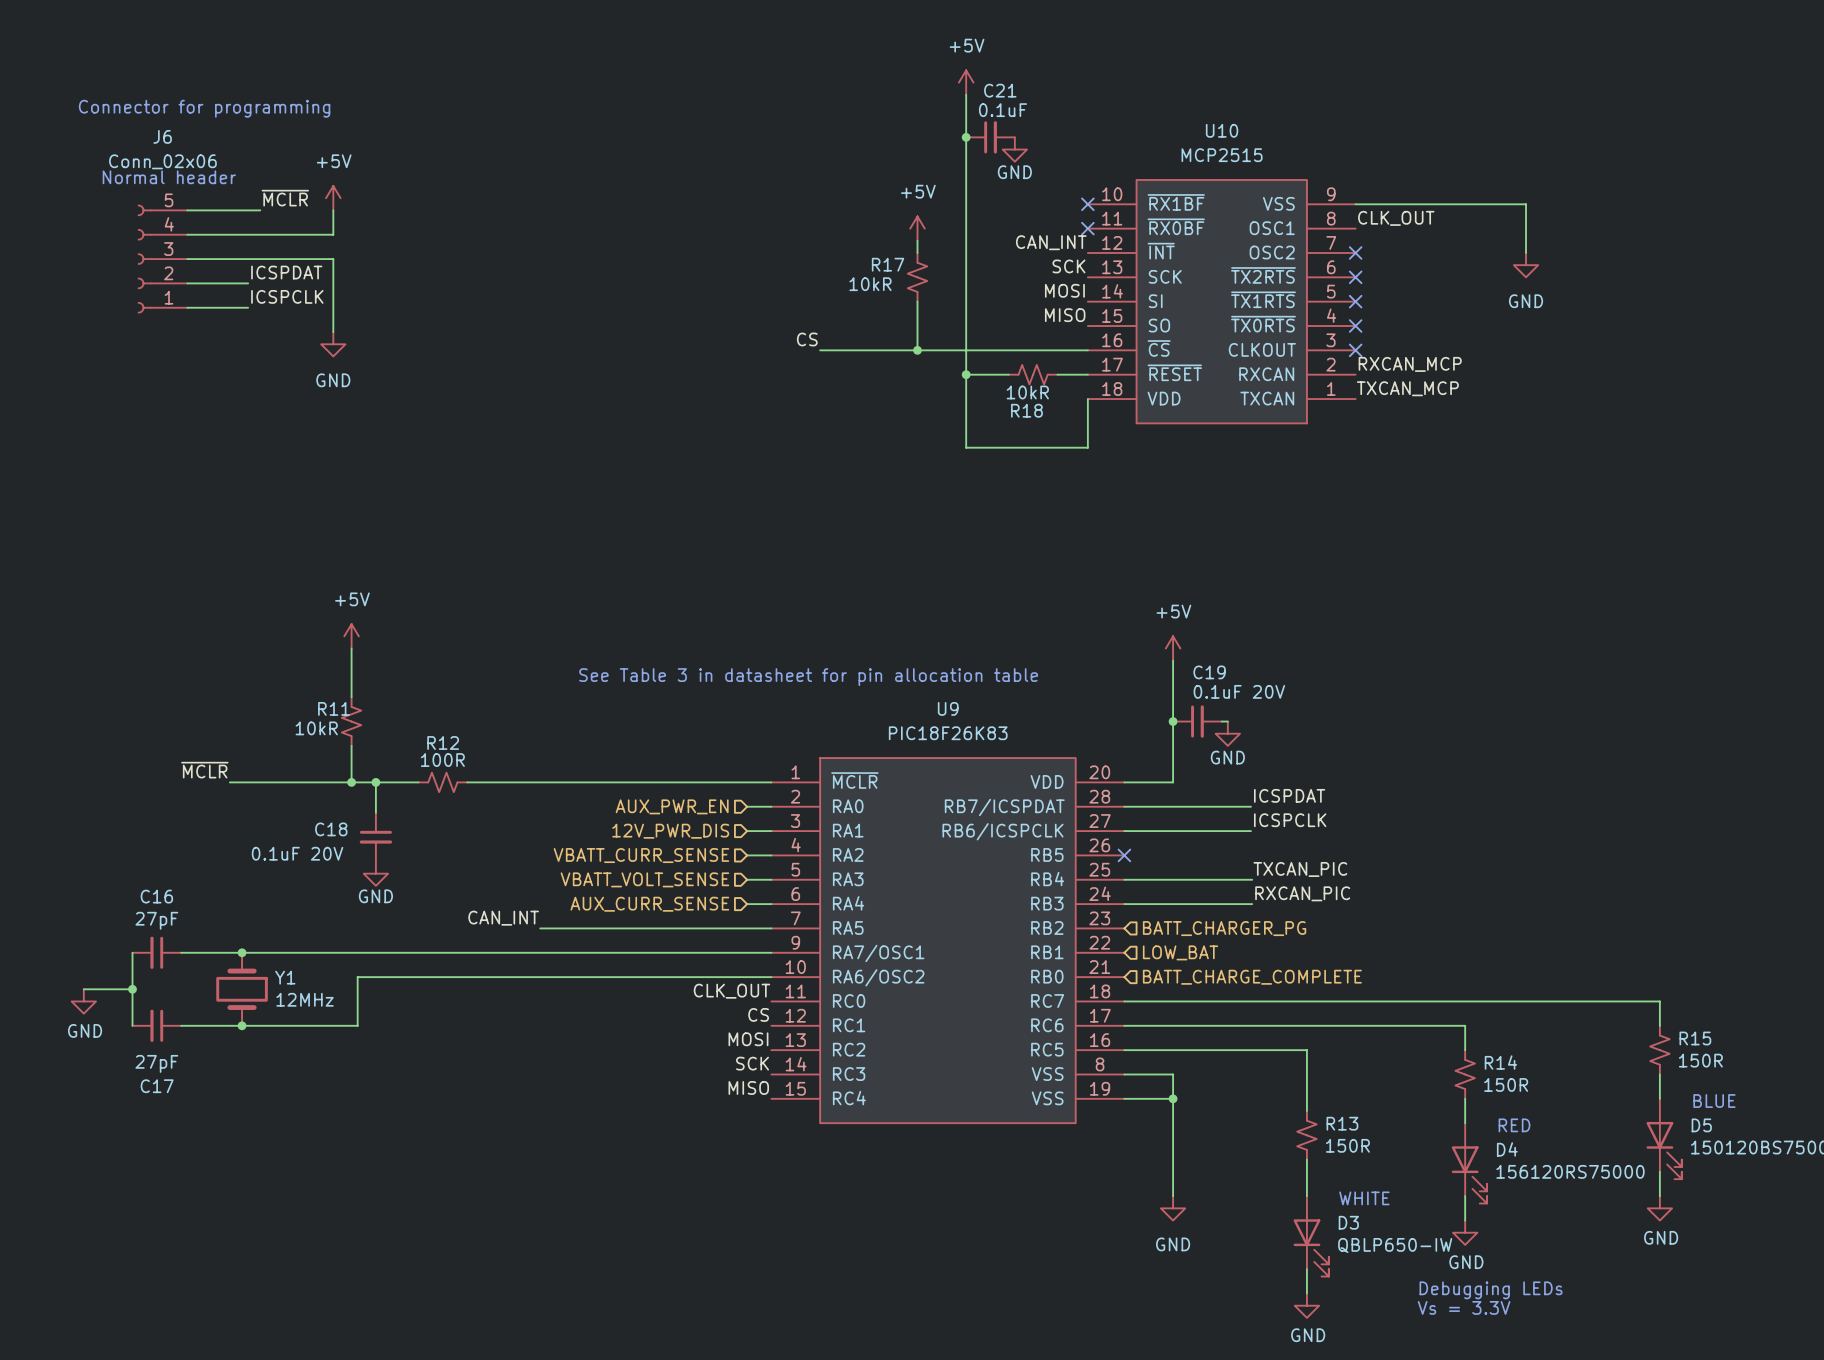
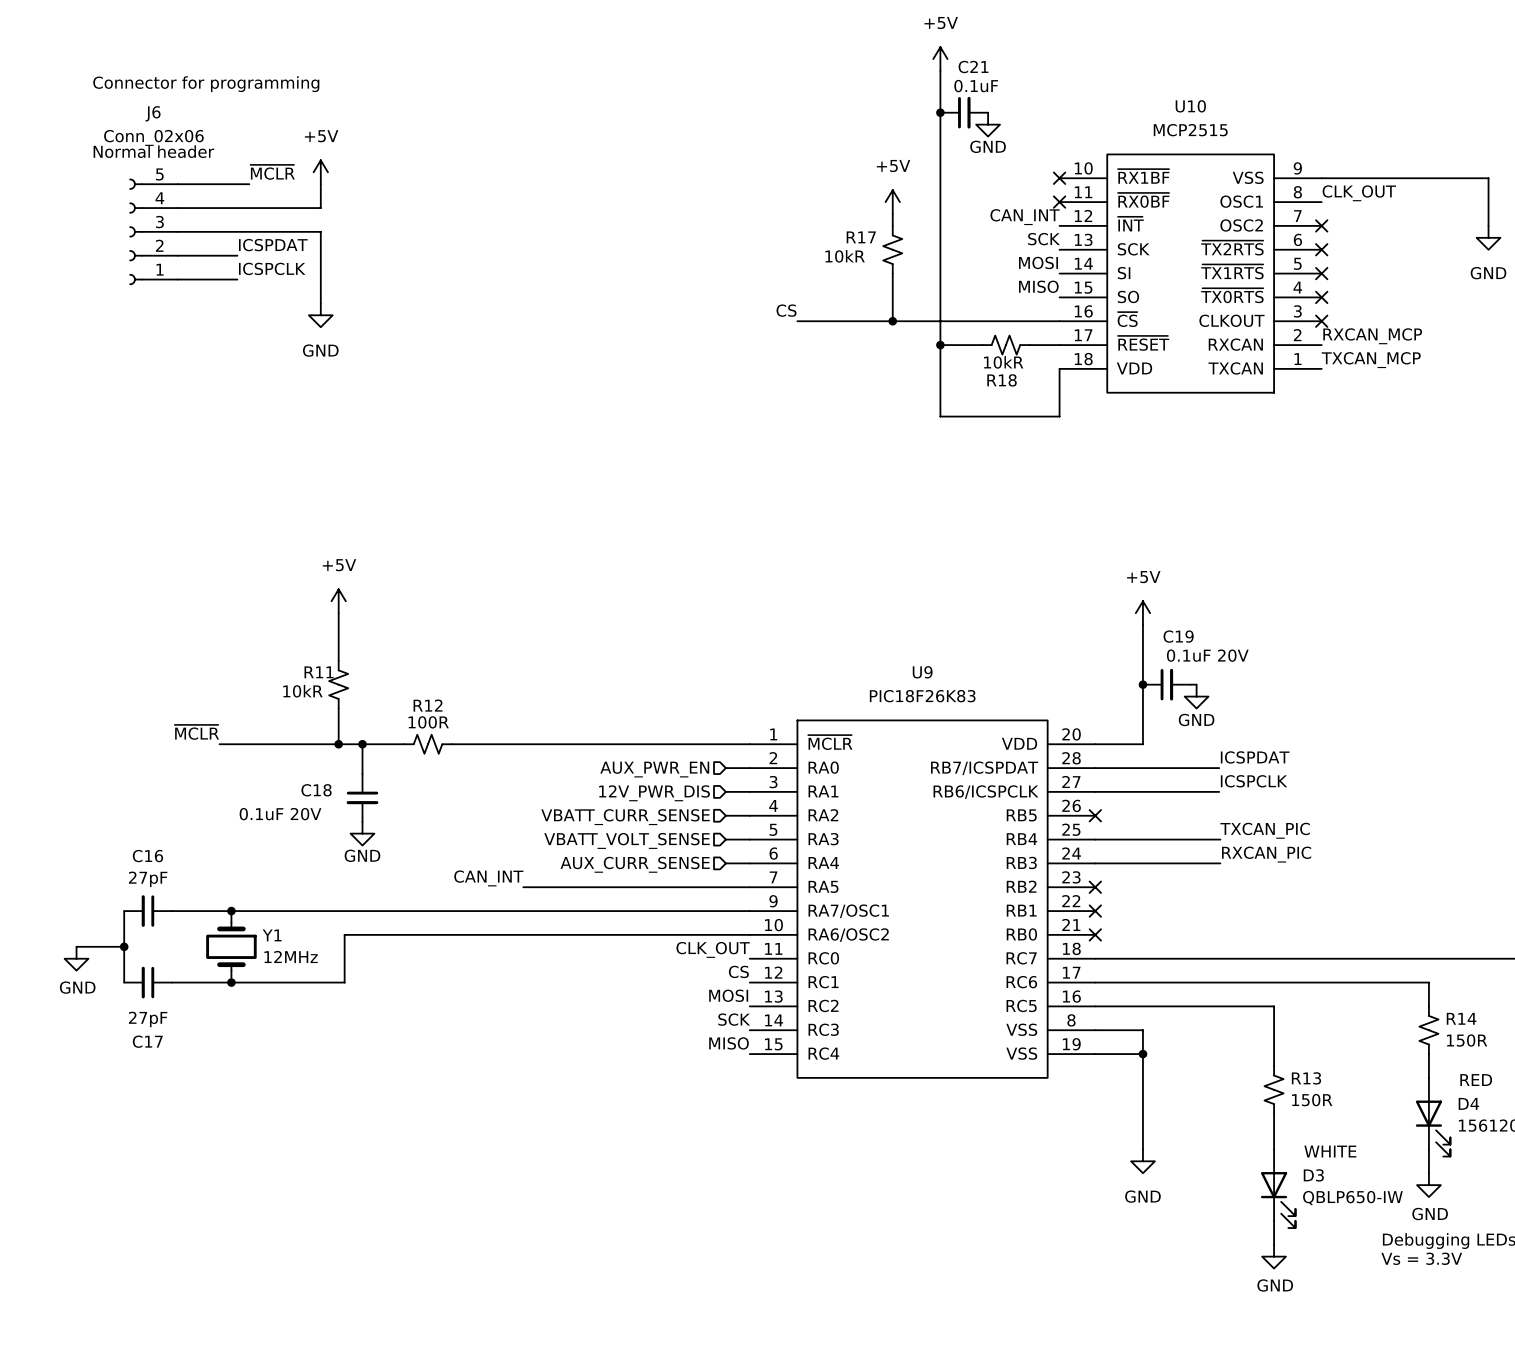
text: See Table 3 in datasheet for pin allocation table (808, 677) -> none
no-connect mark: none -> (1095, 887)
hierarchical label: BATT_CHARGER_PG (1224, 928) -> none
no-connect mark: none -> (1095, 911)
hierarchical label: LOW_BAT (1180, 952) -> none
no-connect mark: none -> (1095, 934)
hierarchical label: BATT_CHARGE_COMPLETE (1252, 977) -> none

